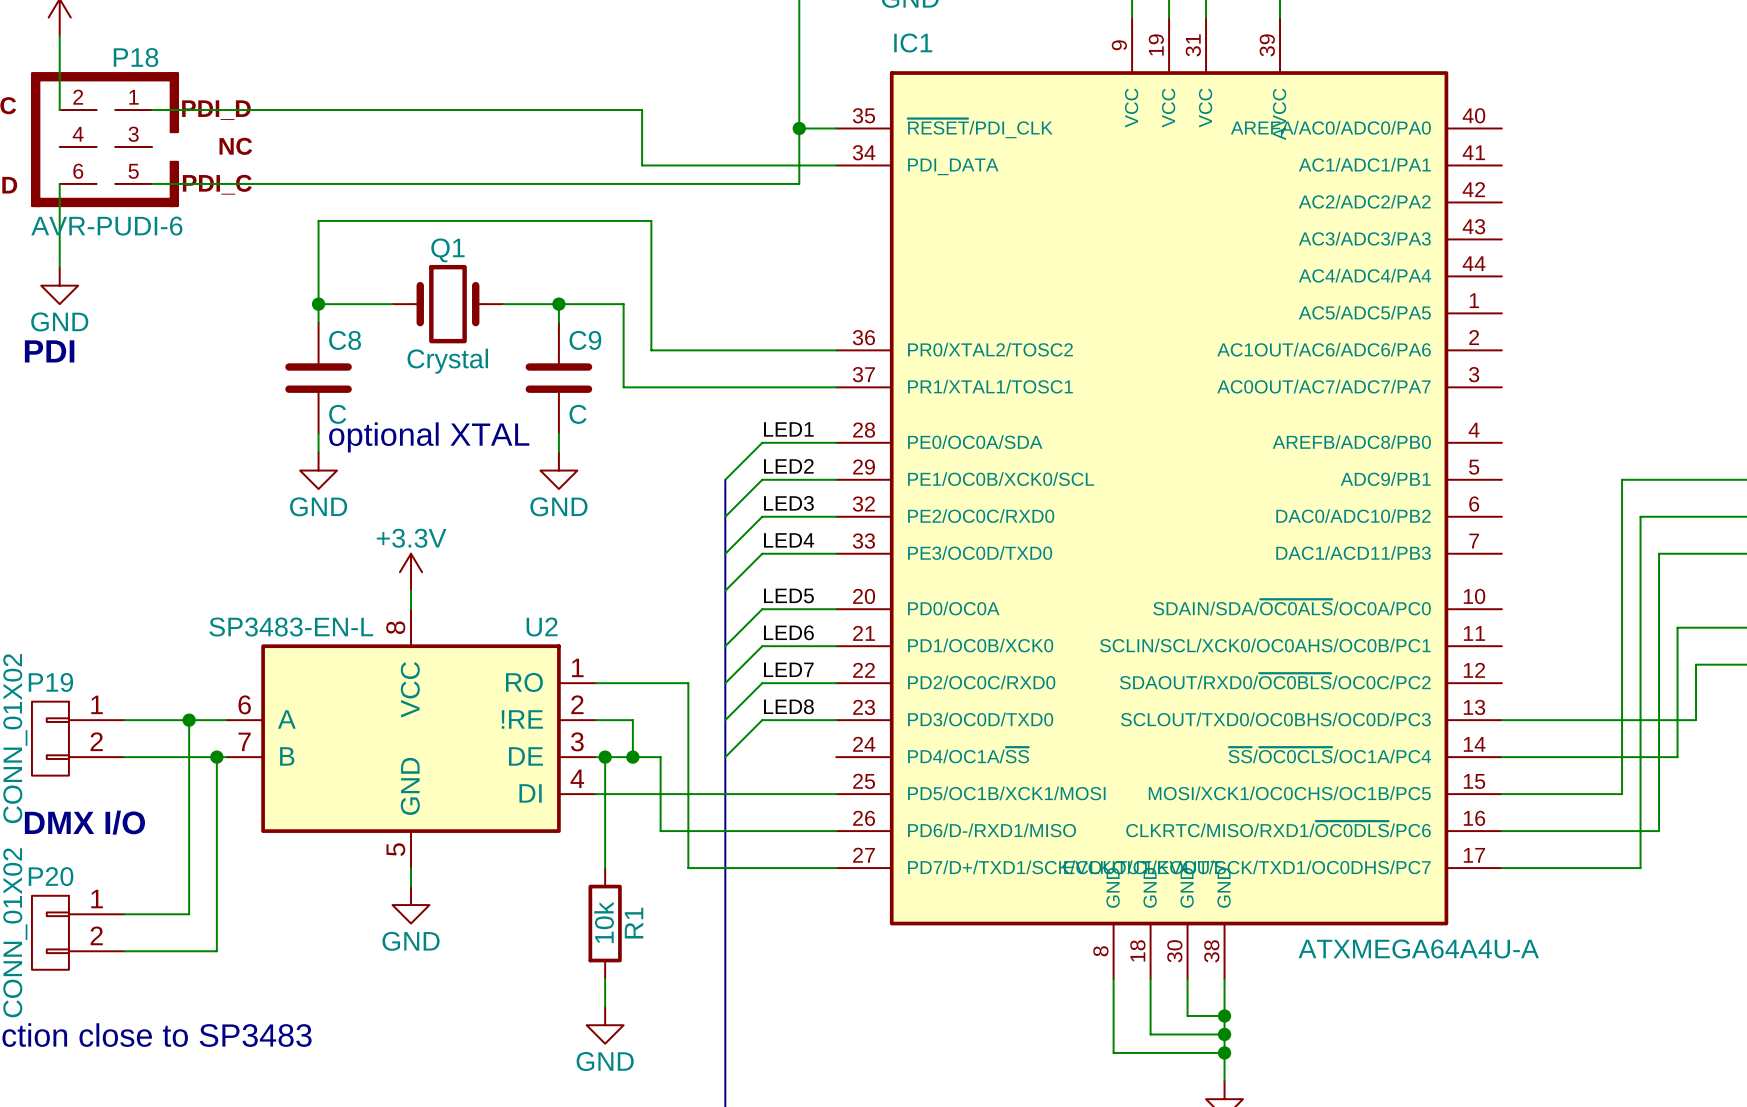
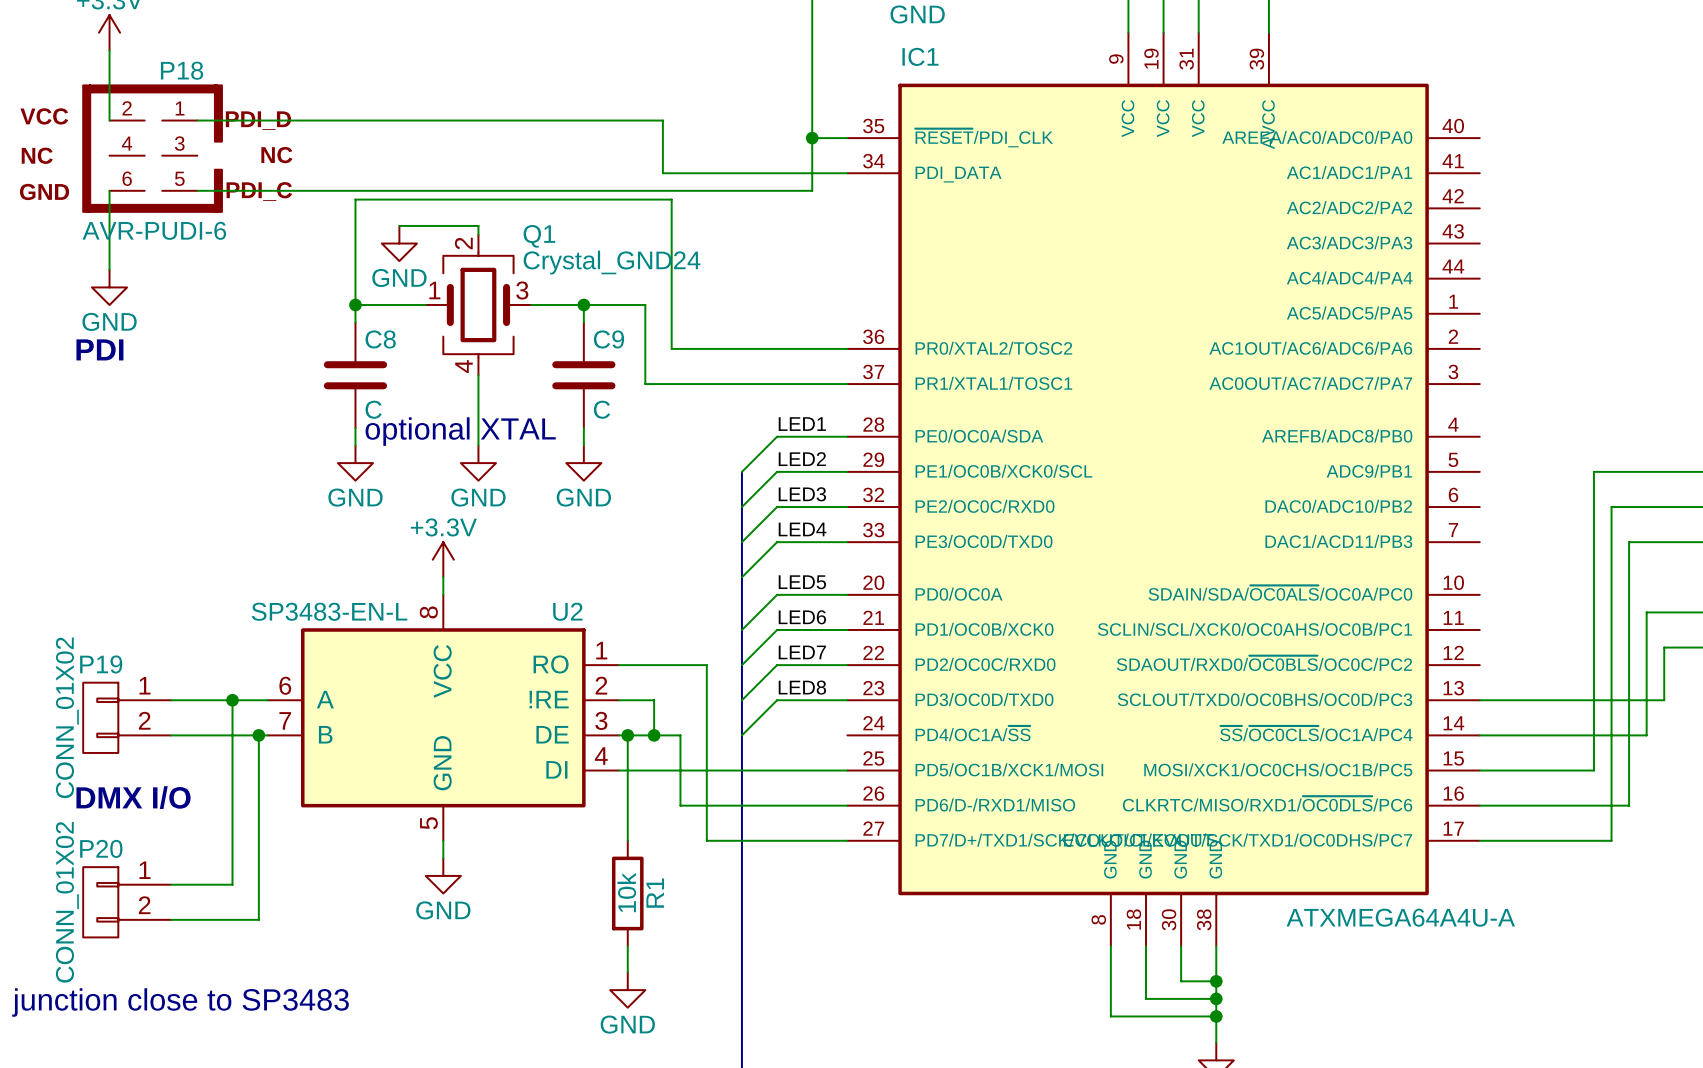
wire: (318, 220) (364, 220) -> none
wire: (447, 220) (651, 220) -> (355, 225) (355, 199) (671, 199) (671, 225)
wire: none -> (478, 225) (478, 234)
power symbol: none -> GND (399, 243)
Q1 name position: Q1 (447, 250) -> Q1 (539, 236)
Q1 symbol: [392, 264, 504, 344] -> [425, 234, 532, 376]
Q1 value: Crystal (447, 361) -> Crystal_GND24 (612, 262)
wire: none -> (478, 375) (478, 445)
power symbol: none -> GND (478, 463)

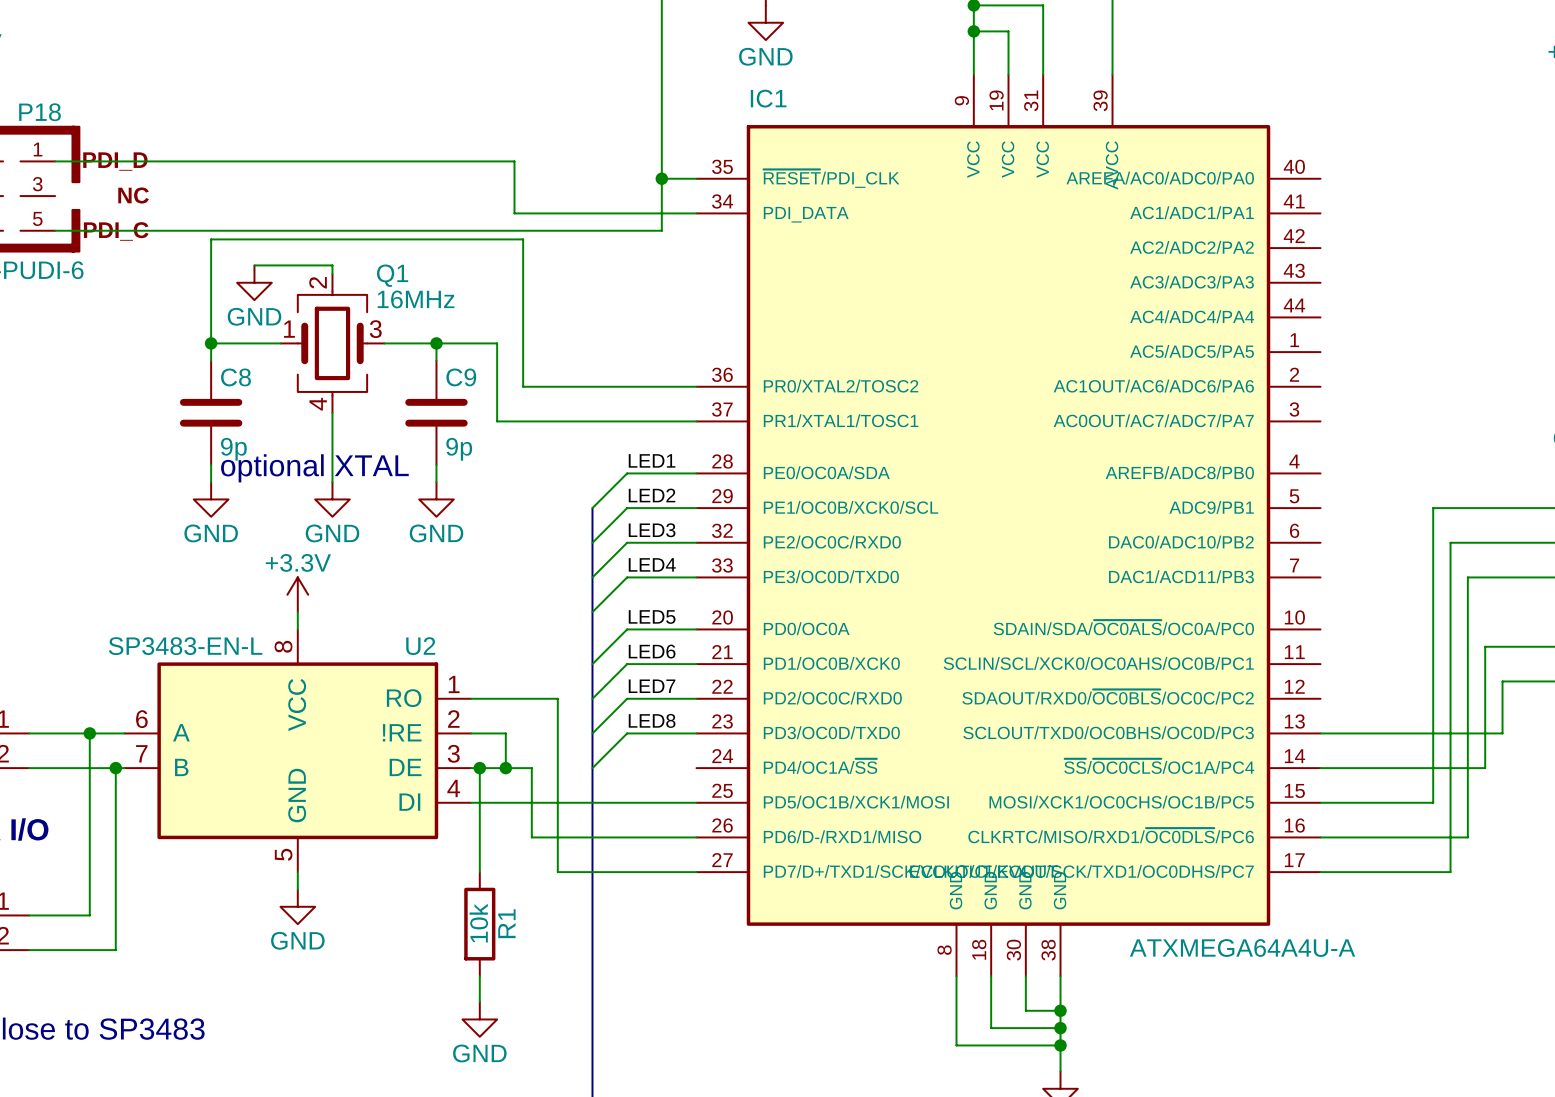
Q1 value: Crystal_GND24 (612, 262) -> 16MHz (416, 299)
C8 value: C (373, 409) -> 9p (233, 449)
C9 value: C (602, 409) -> 9p (459, 449)

